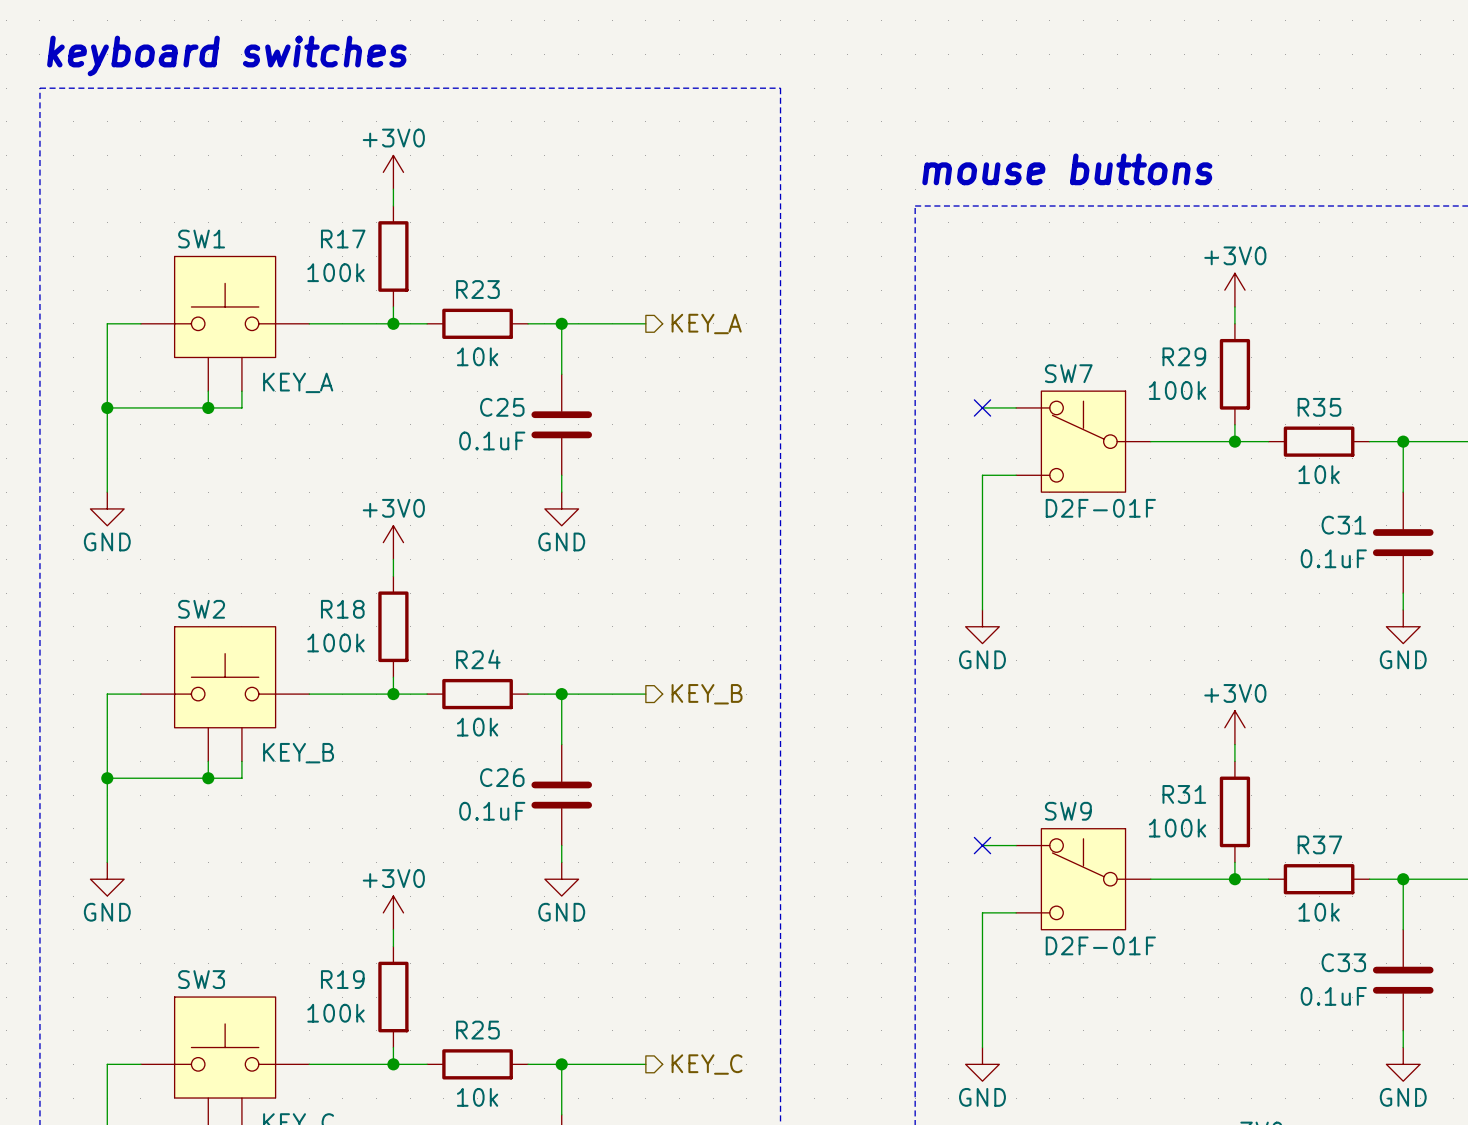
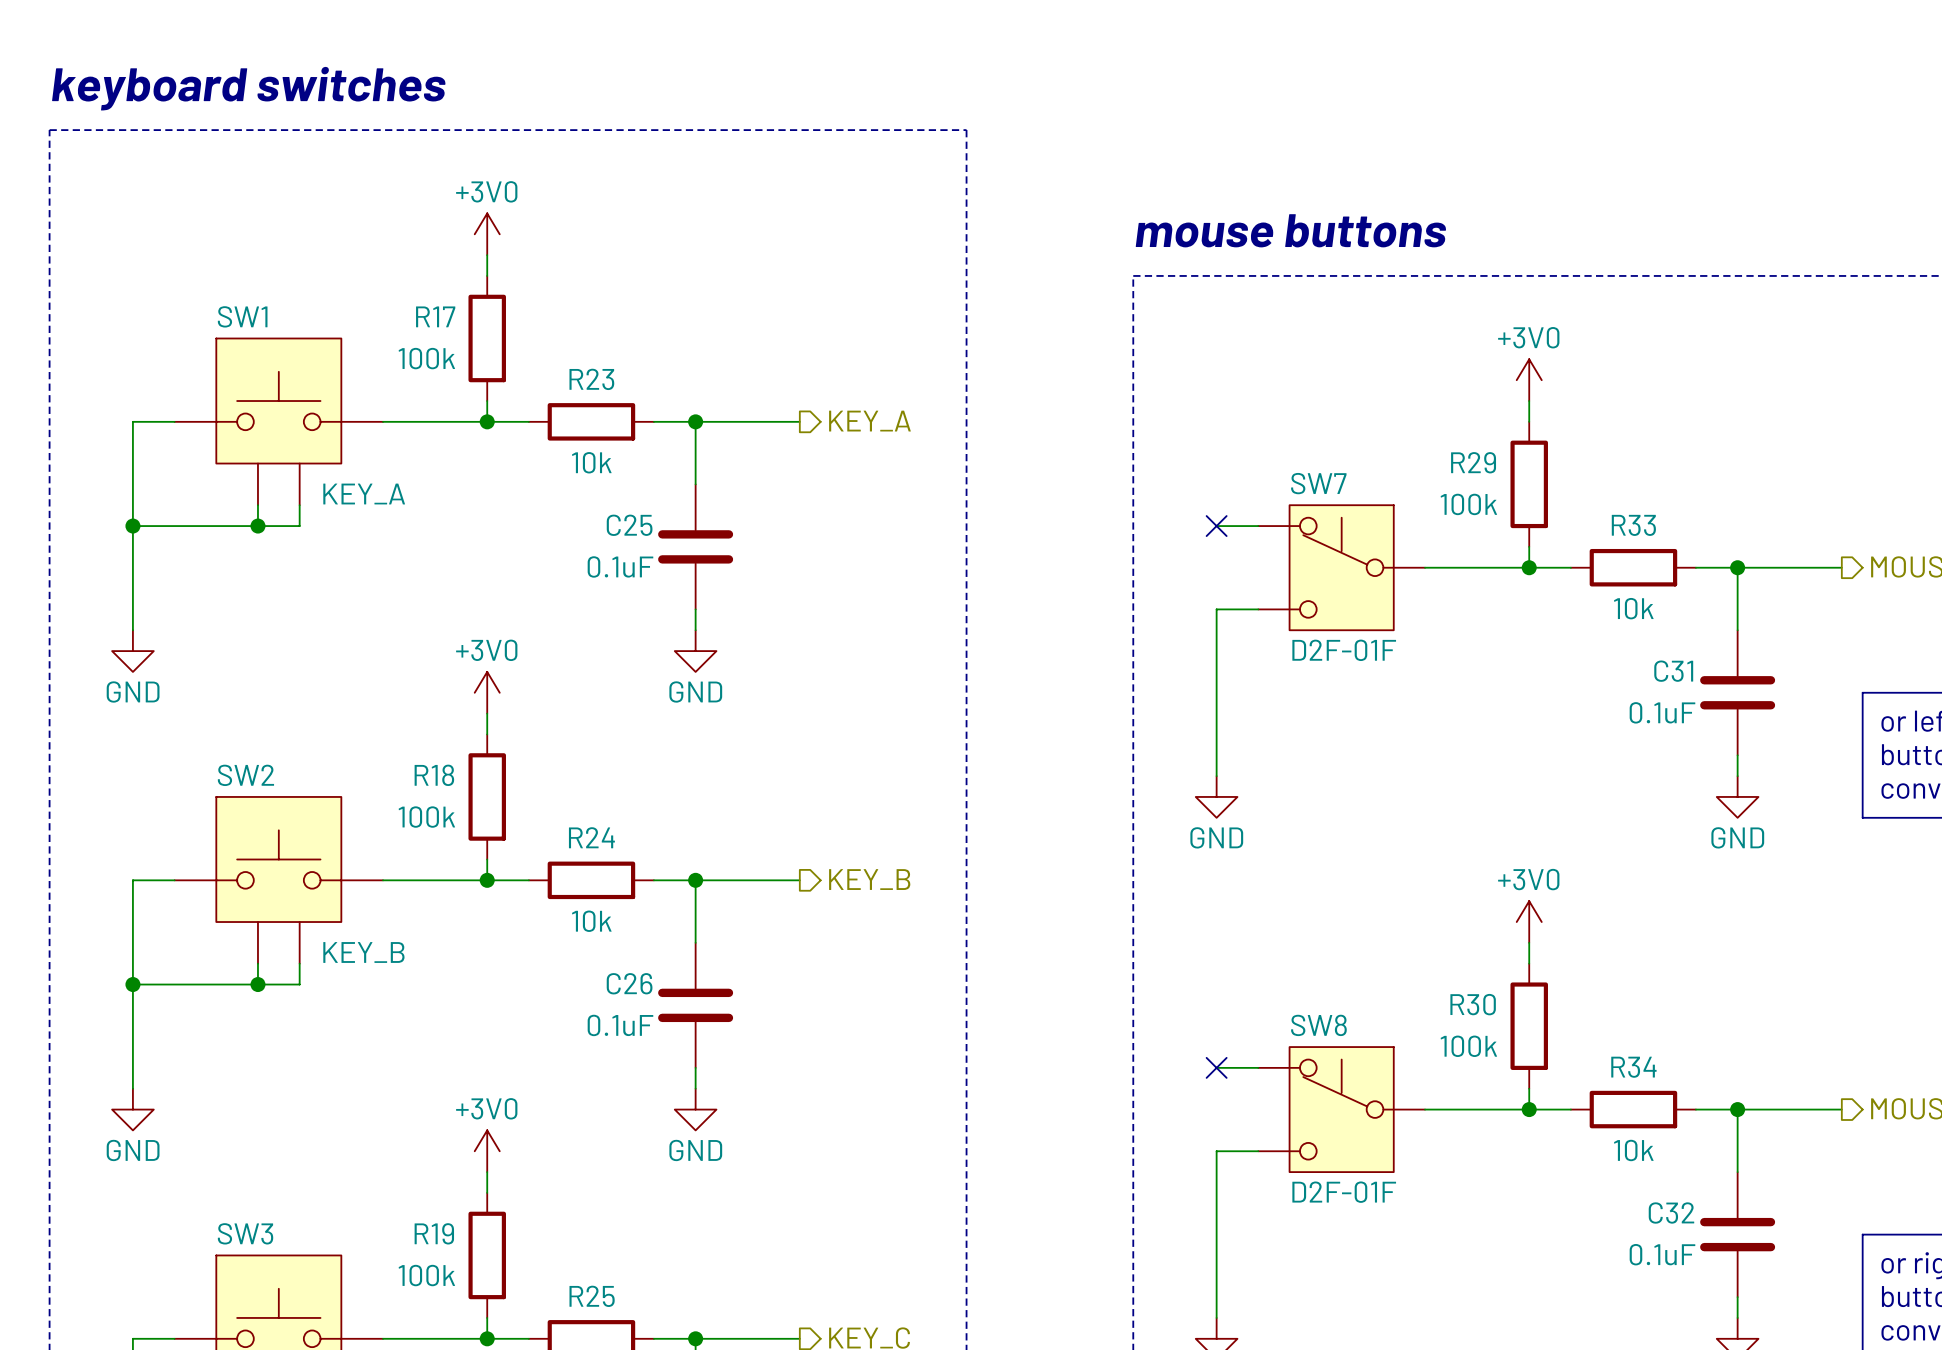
R35 name: R35 (1319, 407) -> R33 (1633, 525)
R31 name: R31 (1184, 794) -> R30 (1473, 1004)
SW9 name: SW9 (1068, 811) -> SW8 (1318, 1025)
R37 name: R37 (1319, 844) -> R34 (1633, 1067)
C33 name: C33 (1343, 962) -> C32 (1671, 1213)

